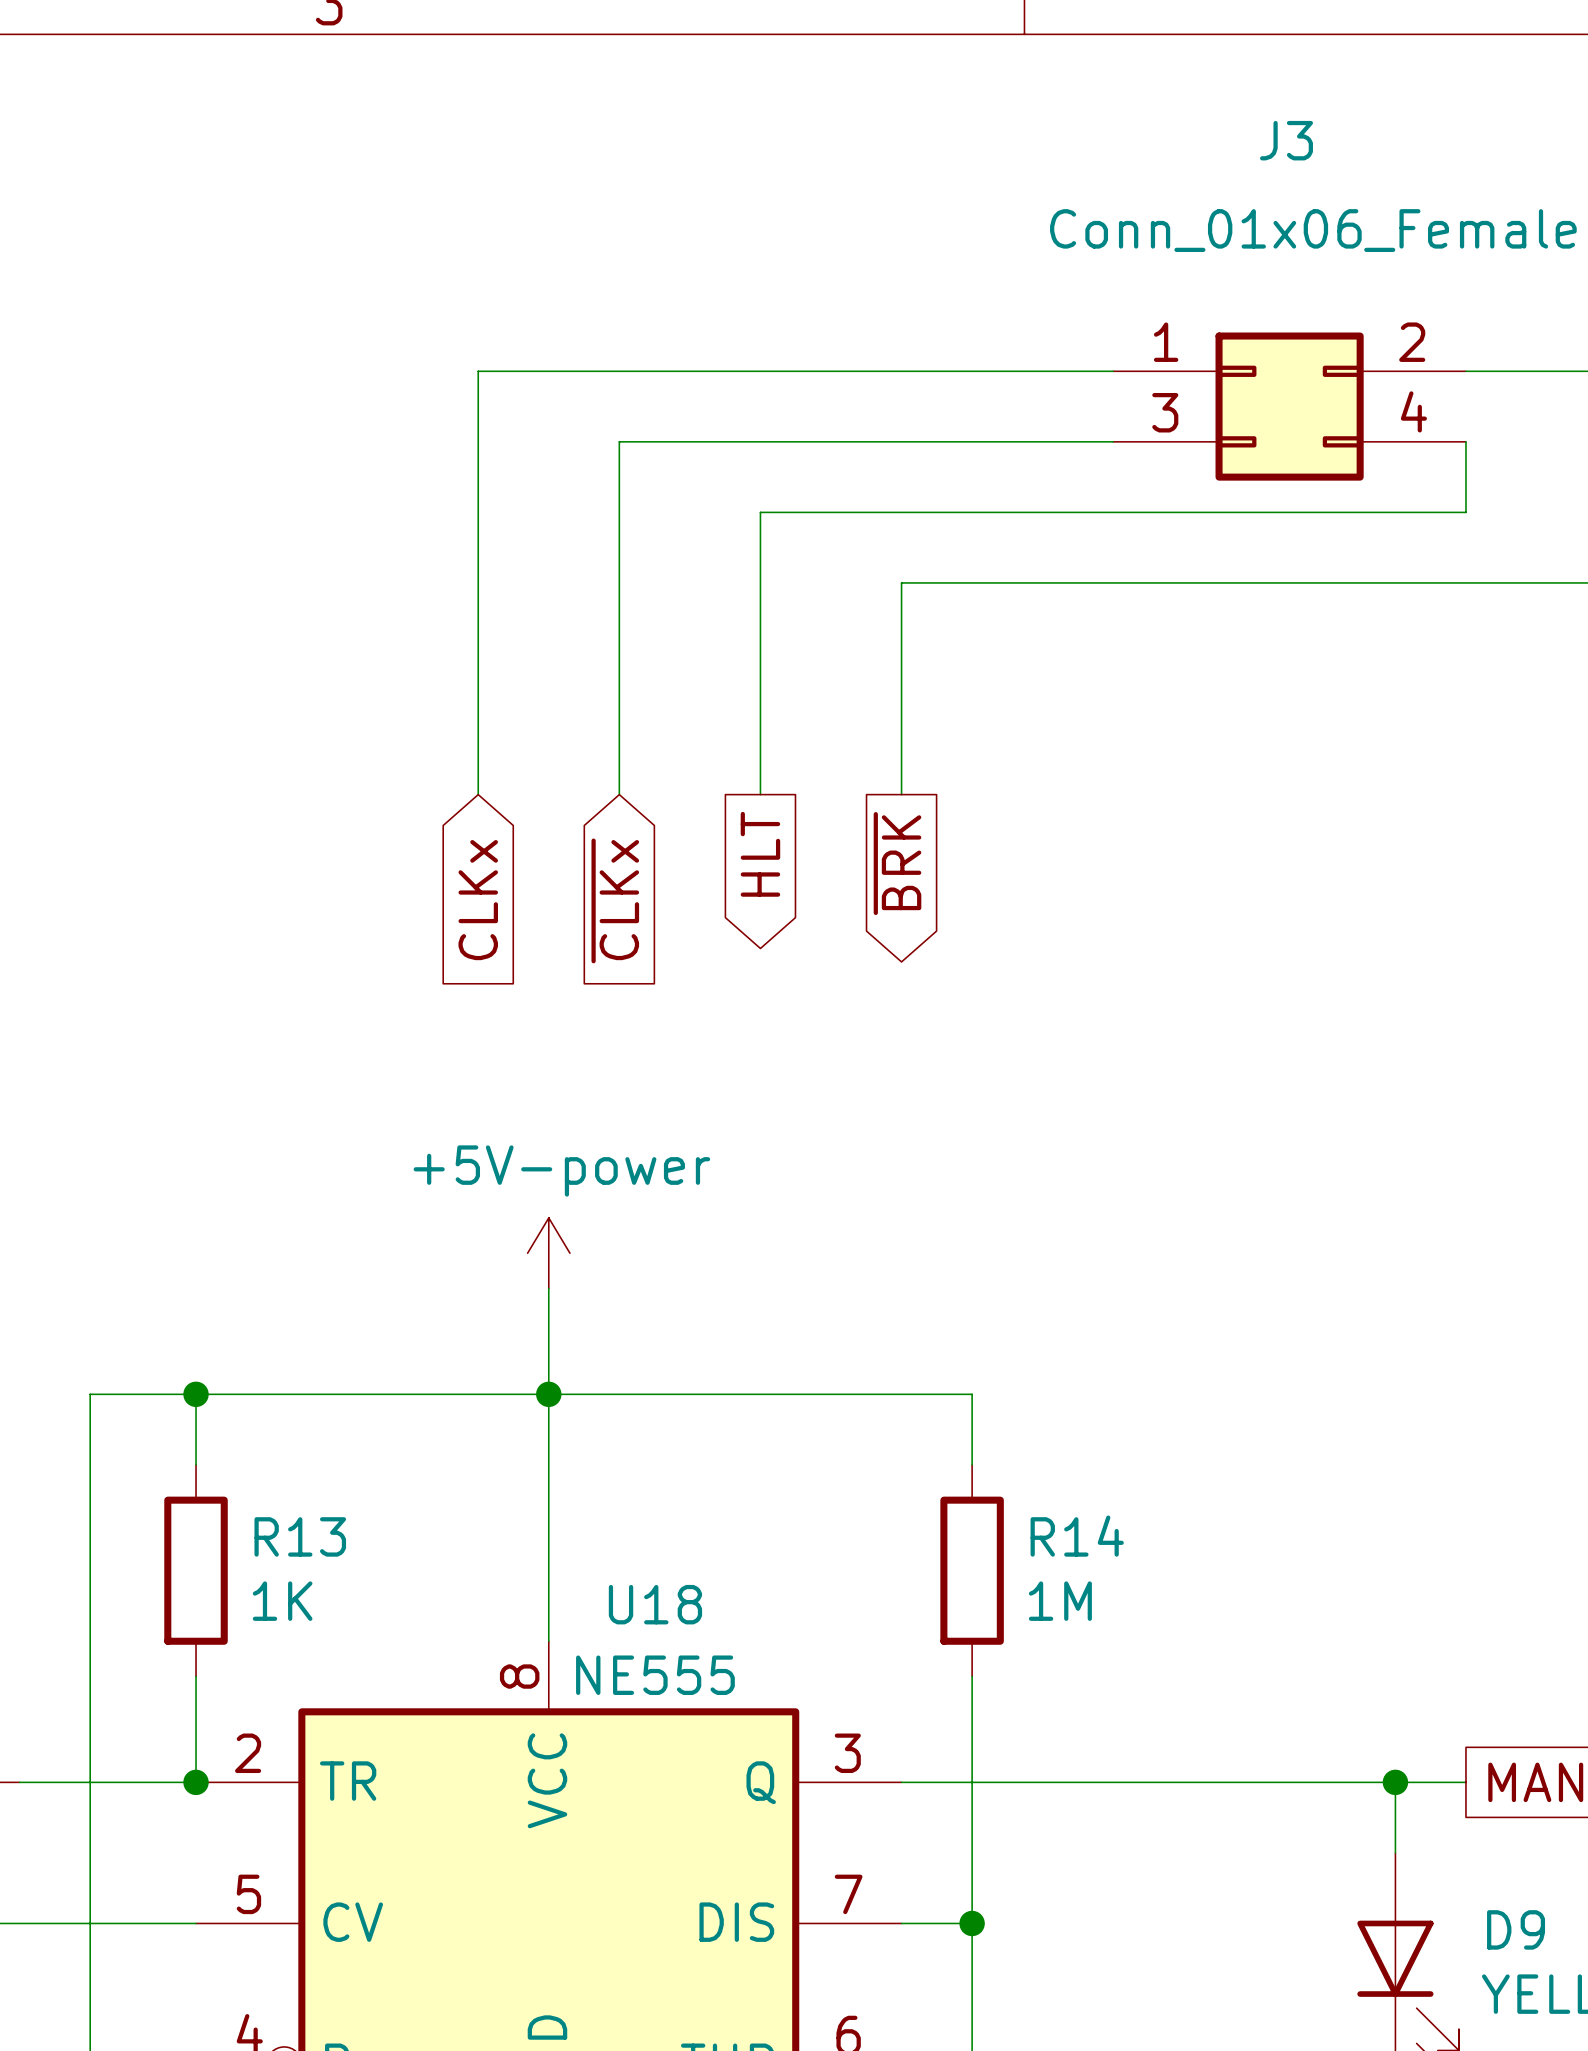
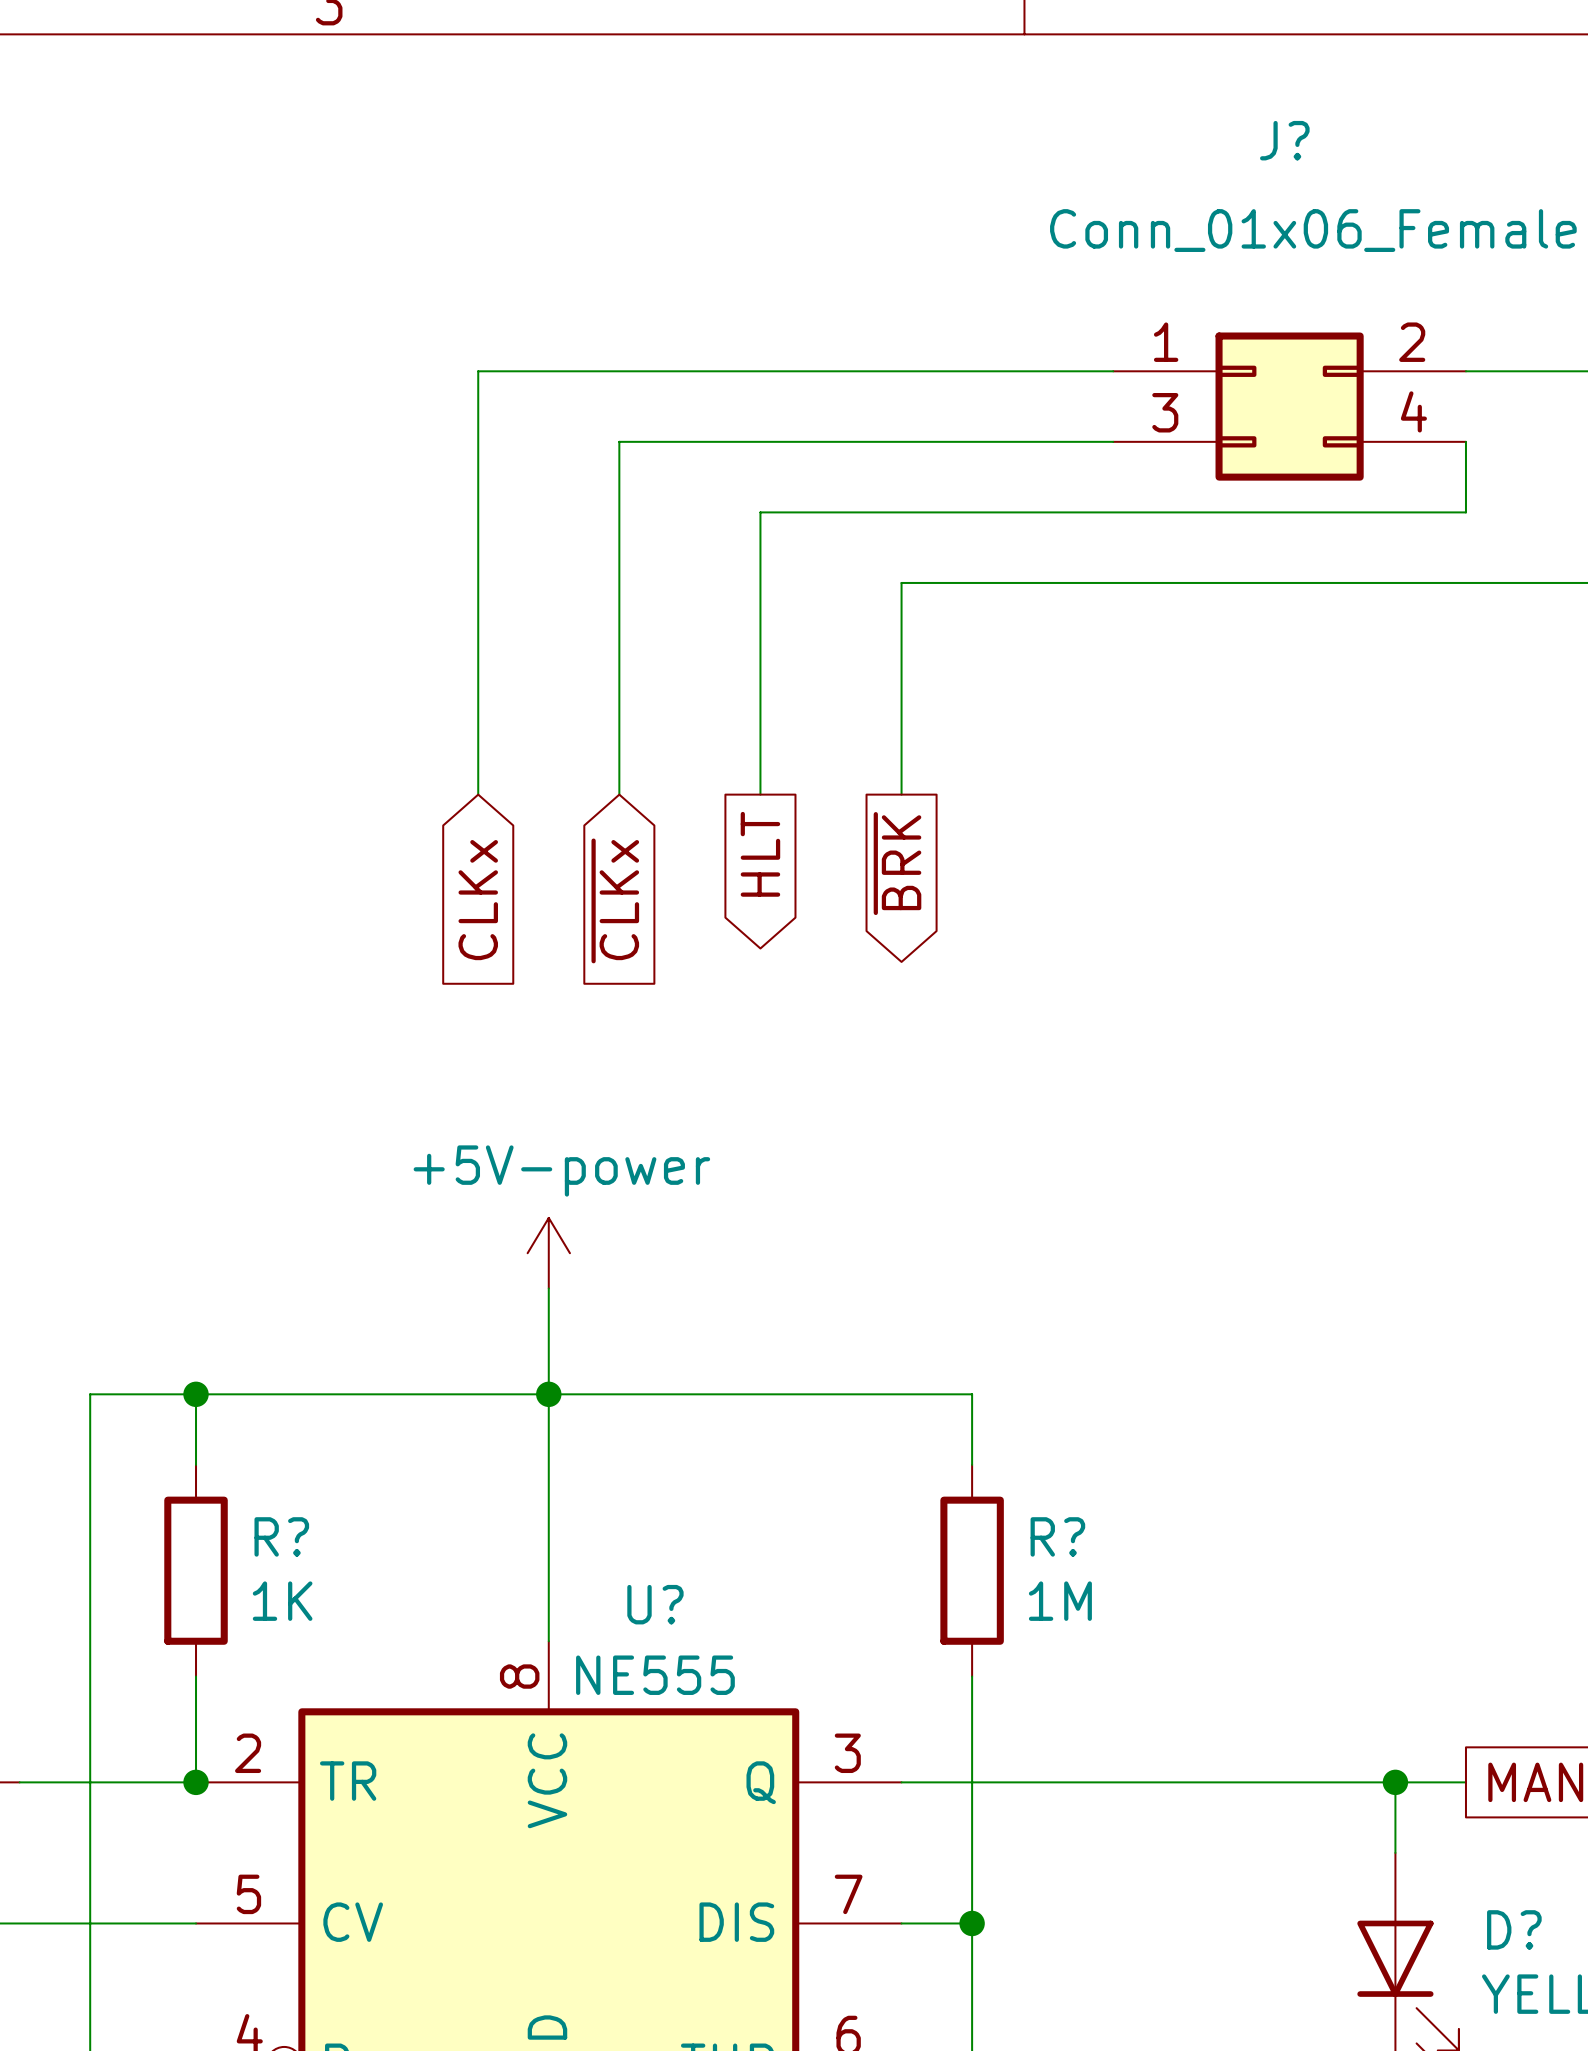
J3 name: J3 (1286, 140) -> J? (1284, 140)
R13 name: R13 (300, 1536) -> R? (281, 1536)
R14 name: R14 (1077, 1536) -> R? (1057, 1536)
U18 name: U18 (655, 1604) -> U? (655, 1604)
D9 name: D9 (1516, 1929) -> D? (1514, 1929)

